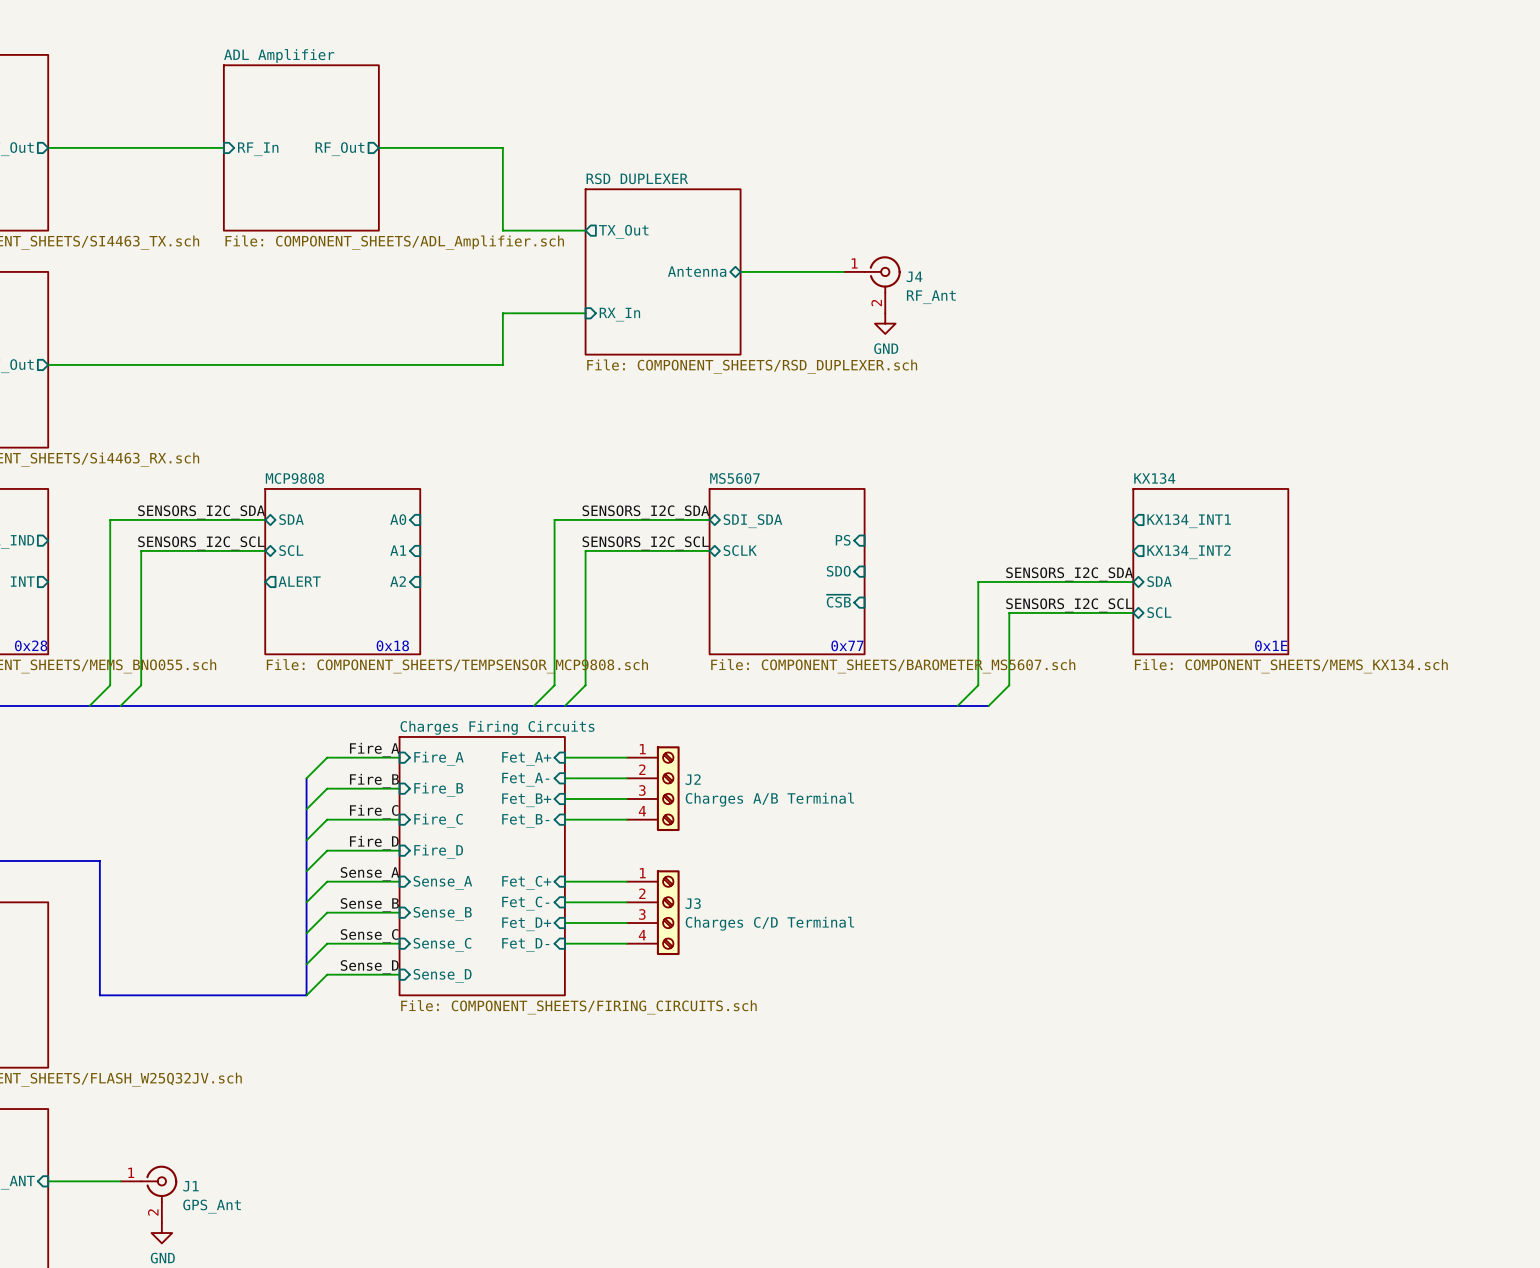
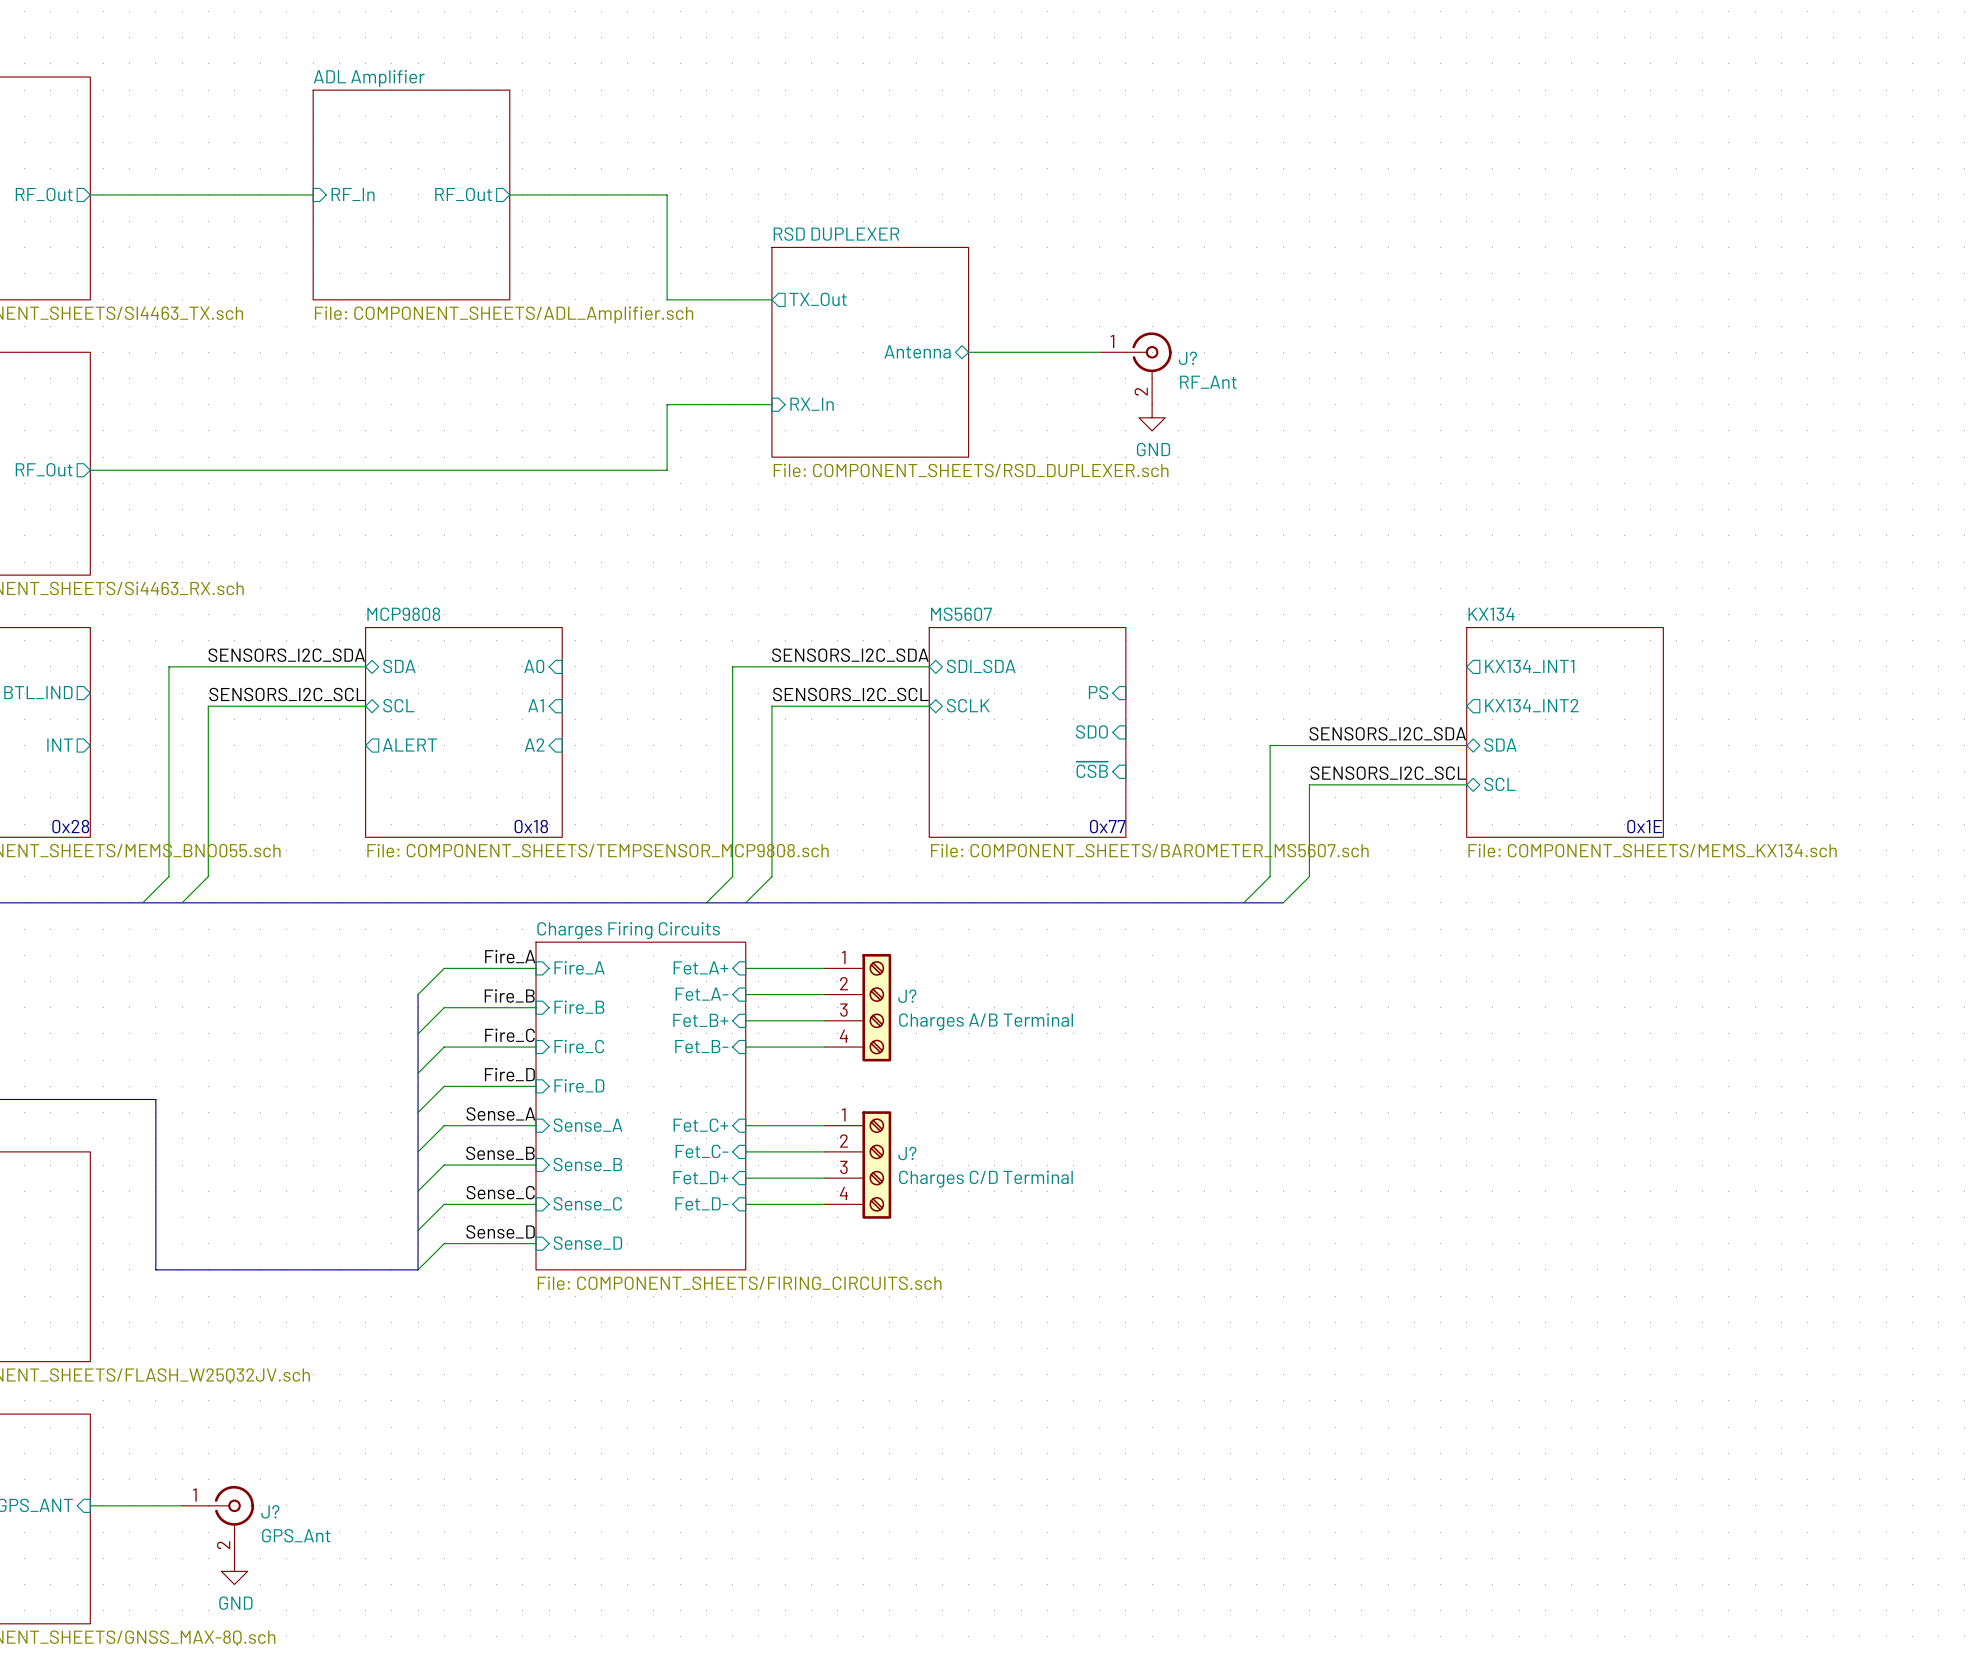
J4 name: J4 (914, 276) -> J? (1187, 358)
J2 name: J2 (693, 779) -> J? (907, 996)
J3 name: J3 (693, 903) -> J? (907, 1153)
J1 name: J1 (190, 1186) -> J? (270, 1511)

